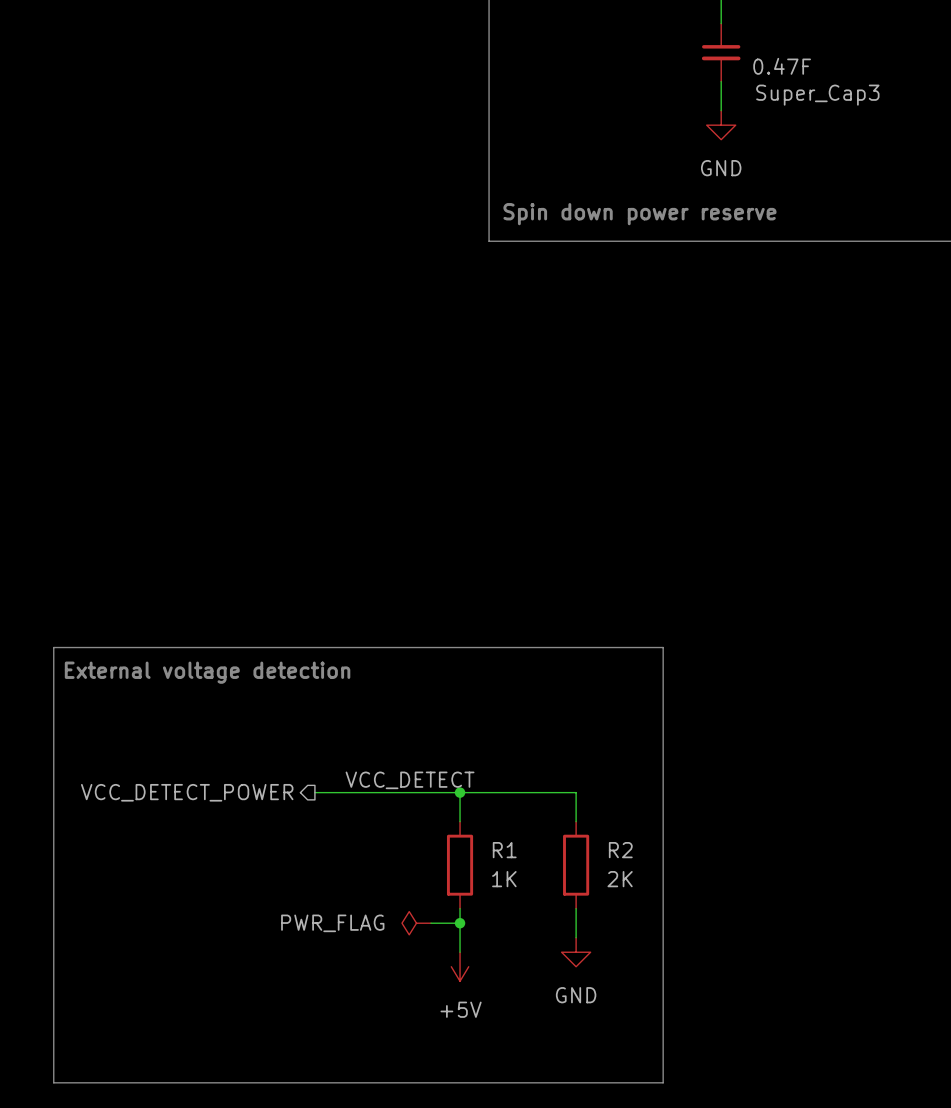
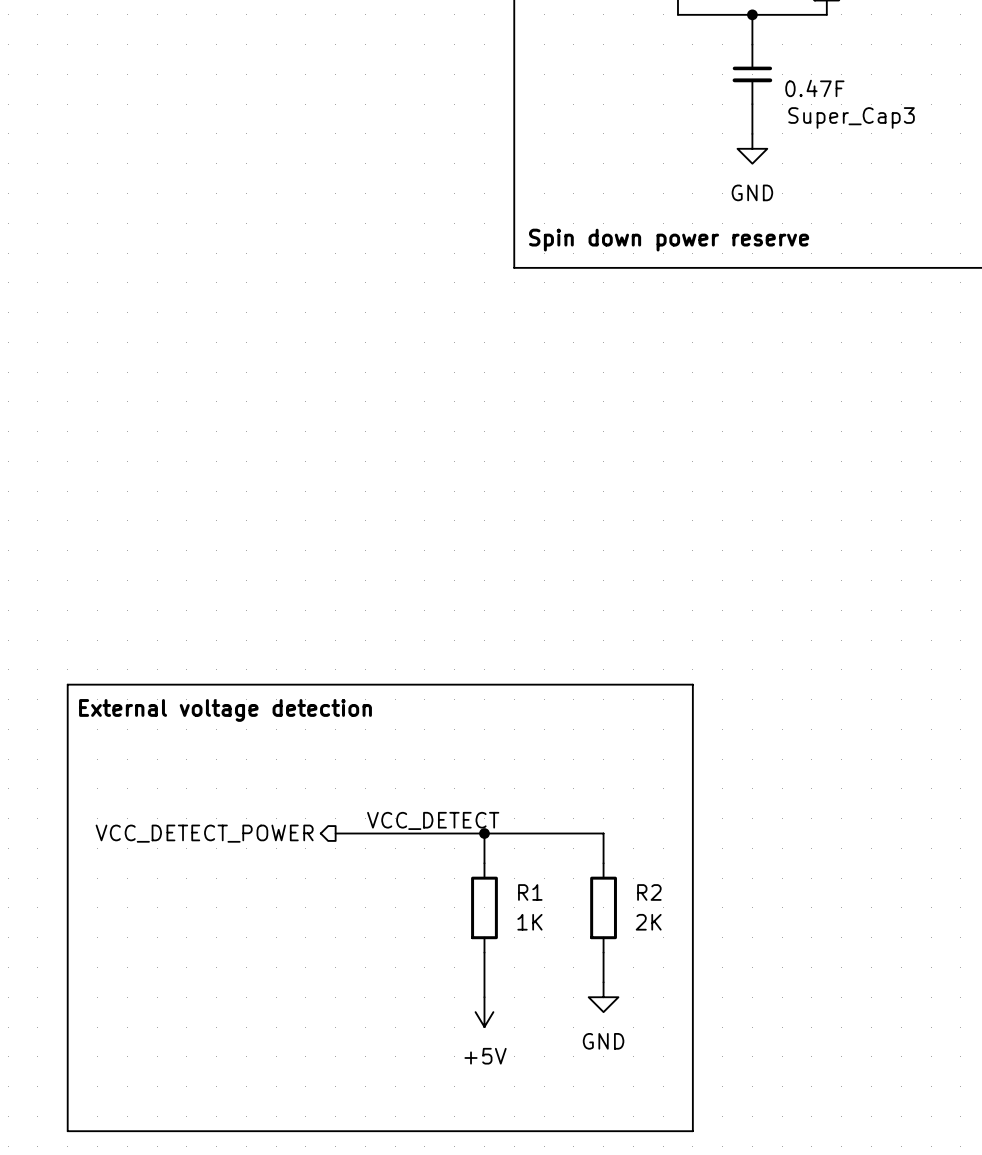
power symbol: PWR_FLAG (416, 923) -> none
wire: (431, 923) (460, 923) -> none
junction: (460, 923) -> none

